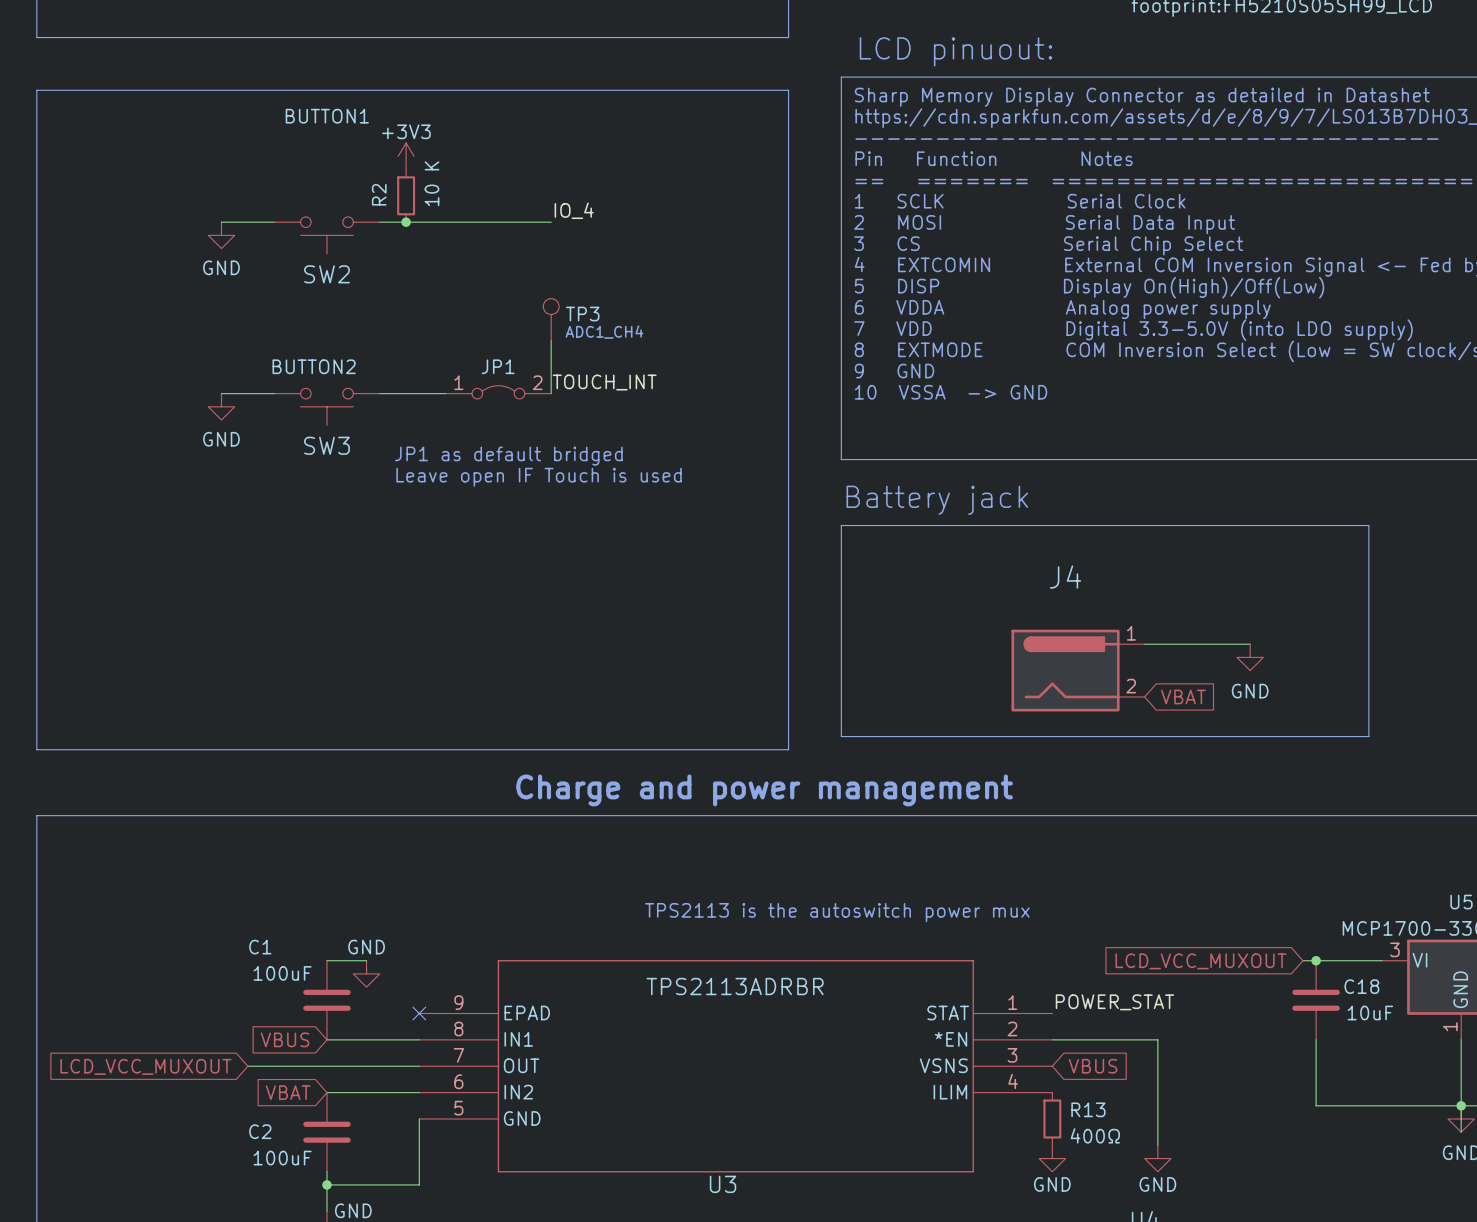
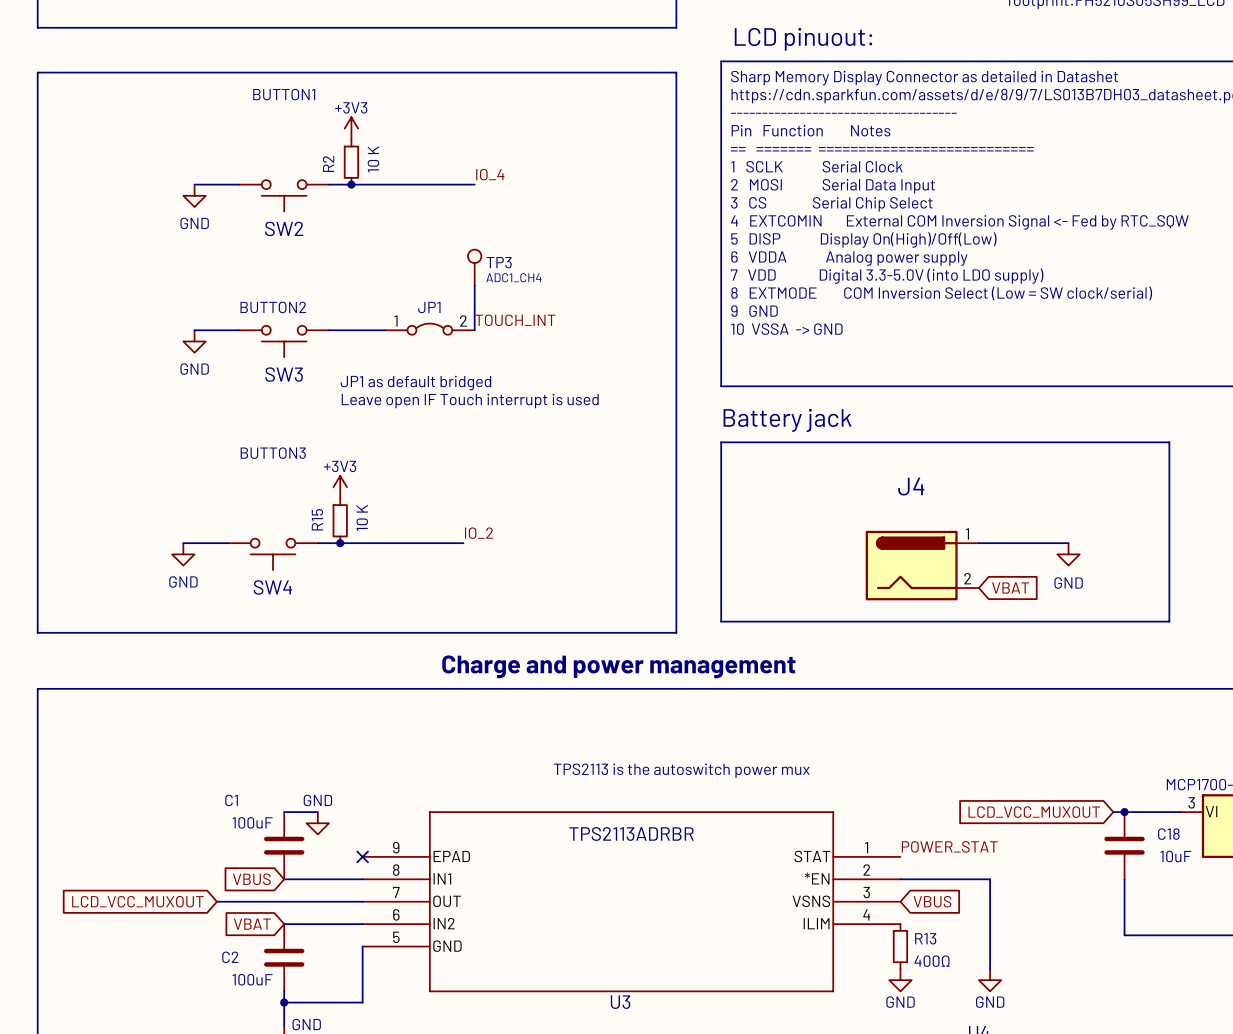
text: Leave open IF Touch is used (539, 477) -> Leave open IF Touch interrupt is used (470, 401)
power symbol: none -> +3V3 (340, 487)
R15: none -> 10 K (340, 520)
label: none -> IO_2 (478, 533)
wire: none -> (183, 543) (228, 543)
wire: none -> (317, 543) (463, 543)
junction: none -> (340, 543)
power symbol: none -> GND (183, 554)
SW4: none -> BUTTON3 (272, 554)

